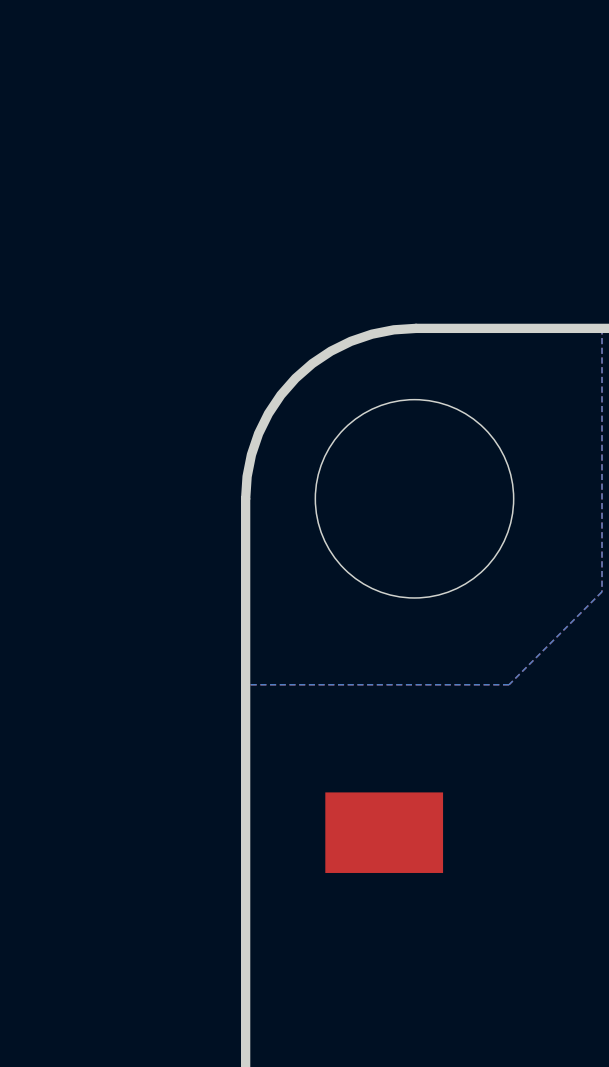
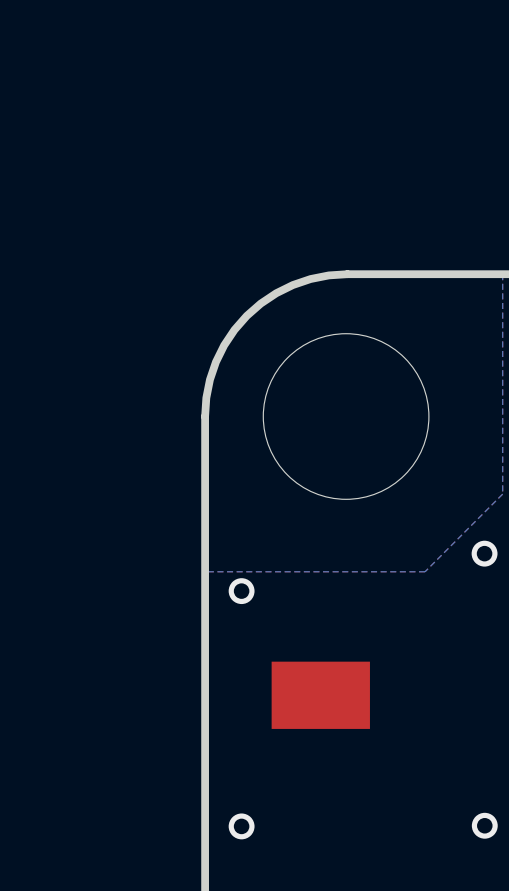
via: none -> (484, 553)
via: none -> (241, 591)
via: none -> (484, 825)
via: none -> (241, 826)

